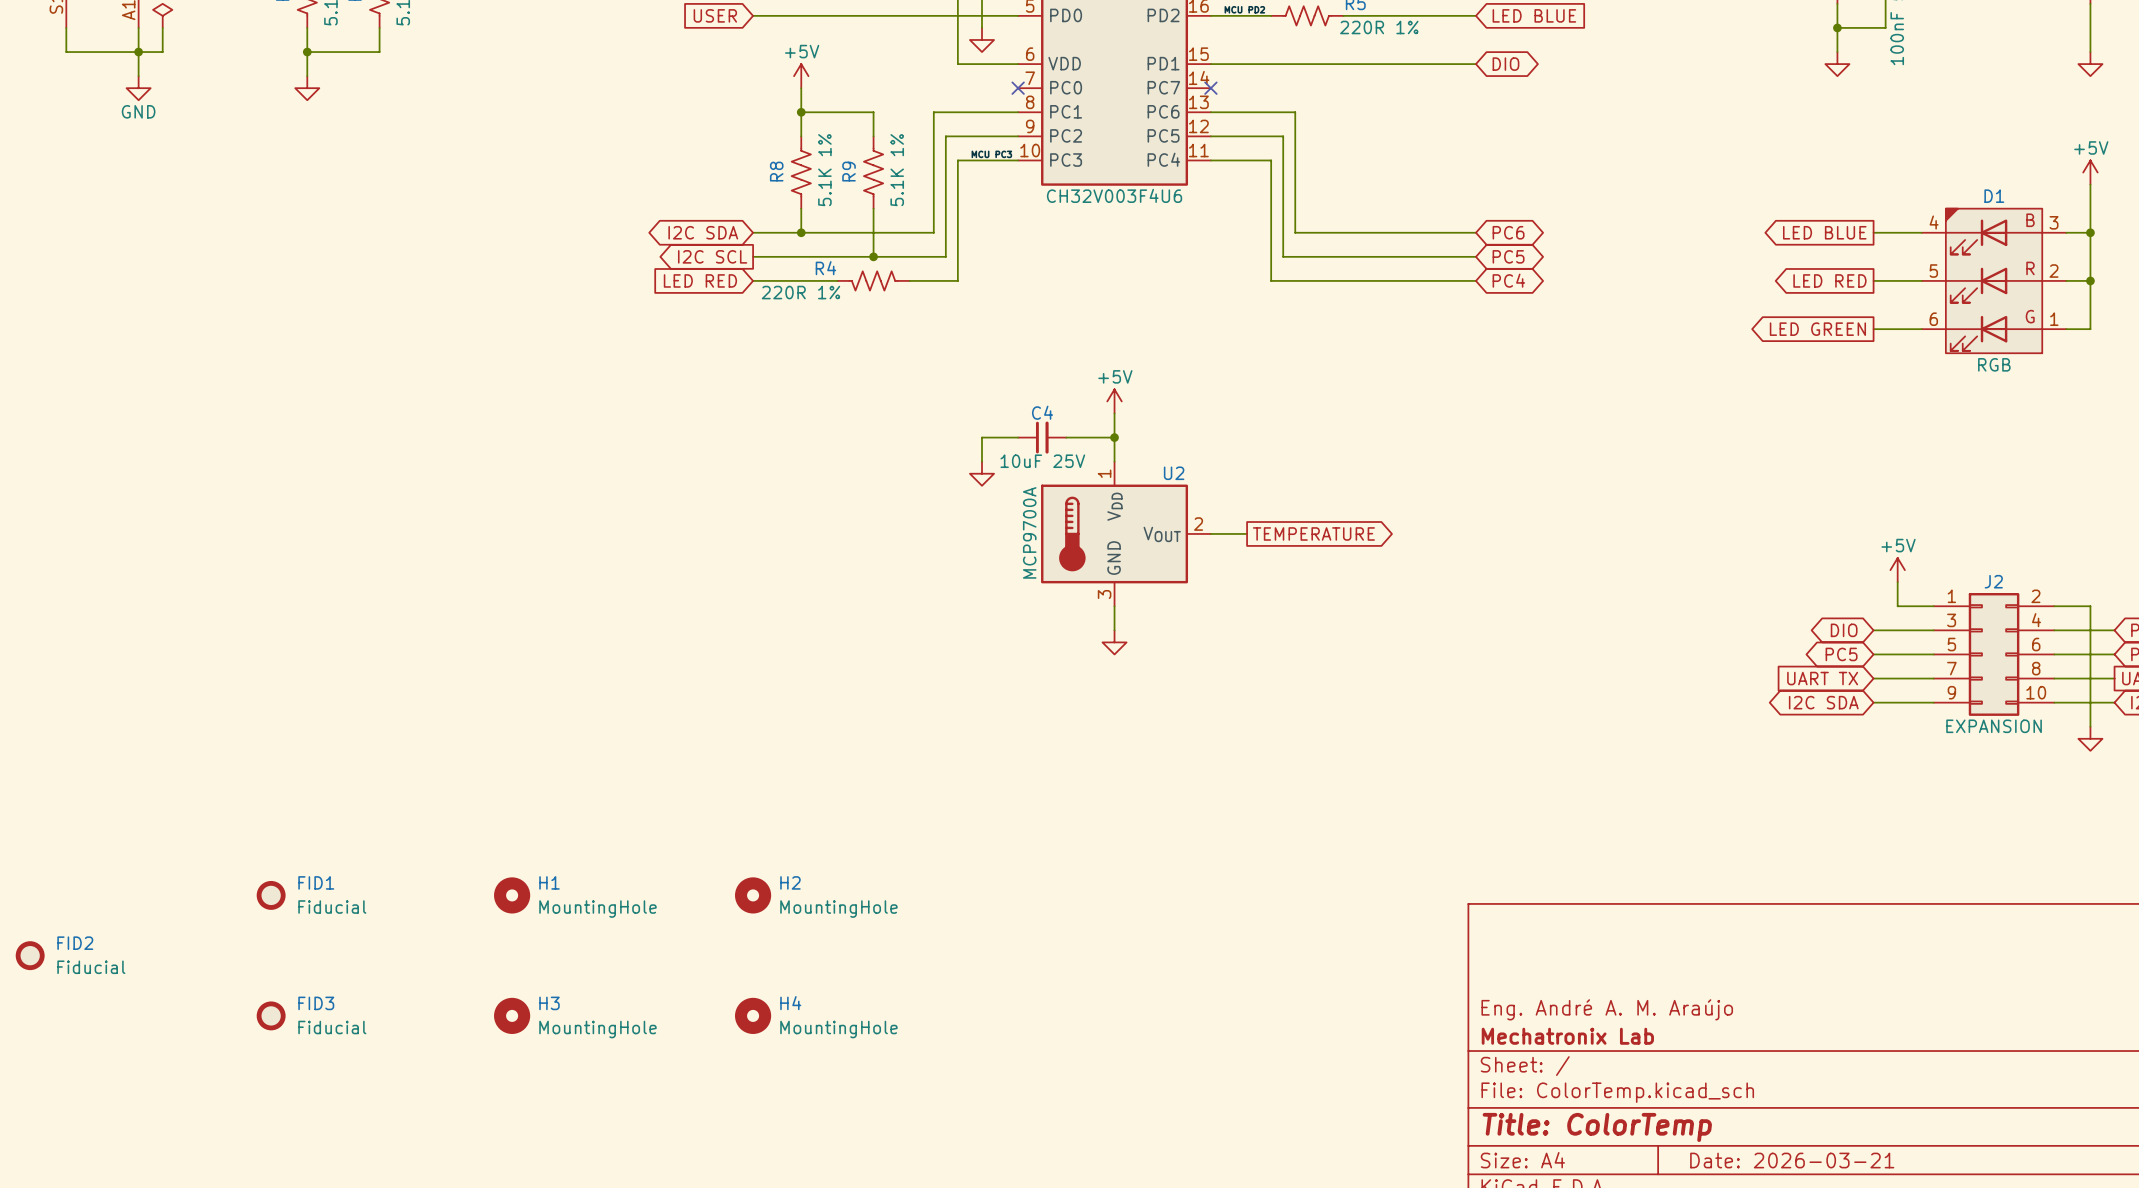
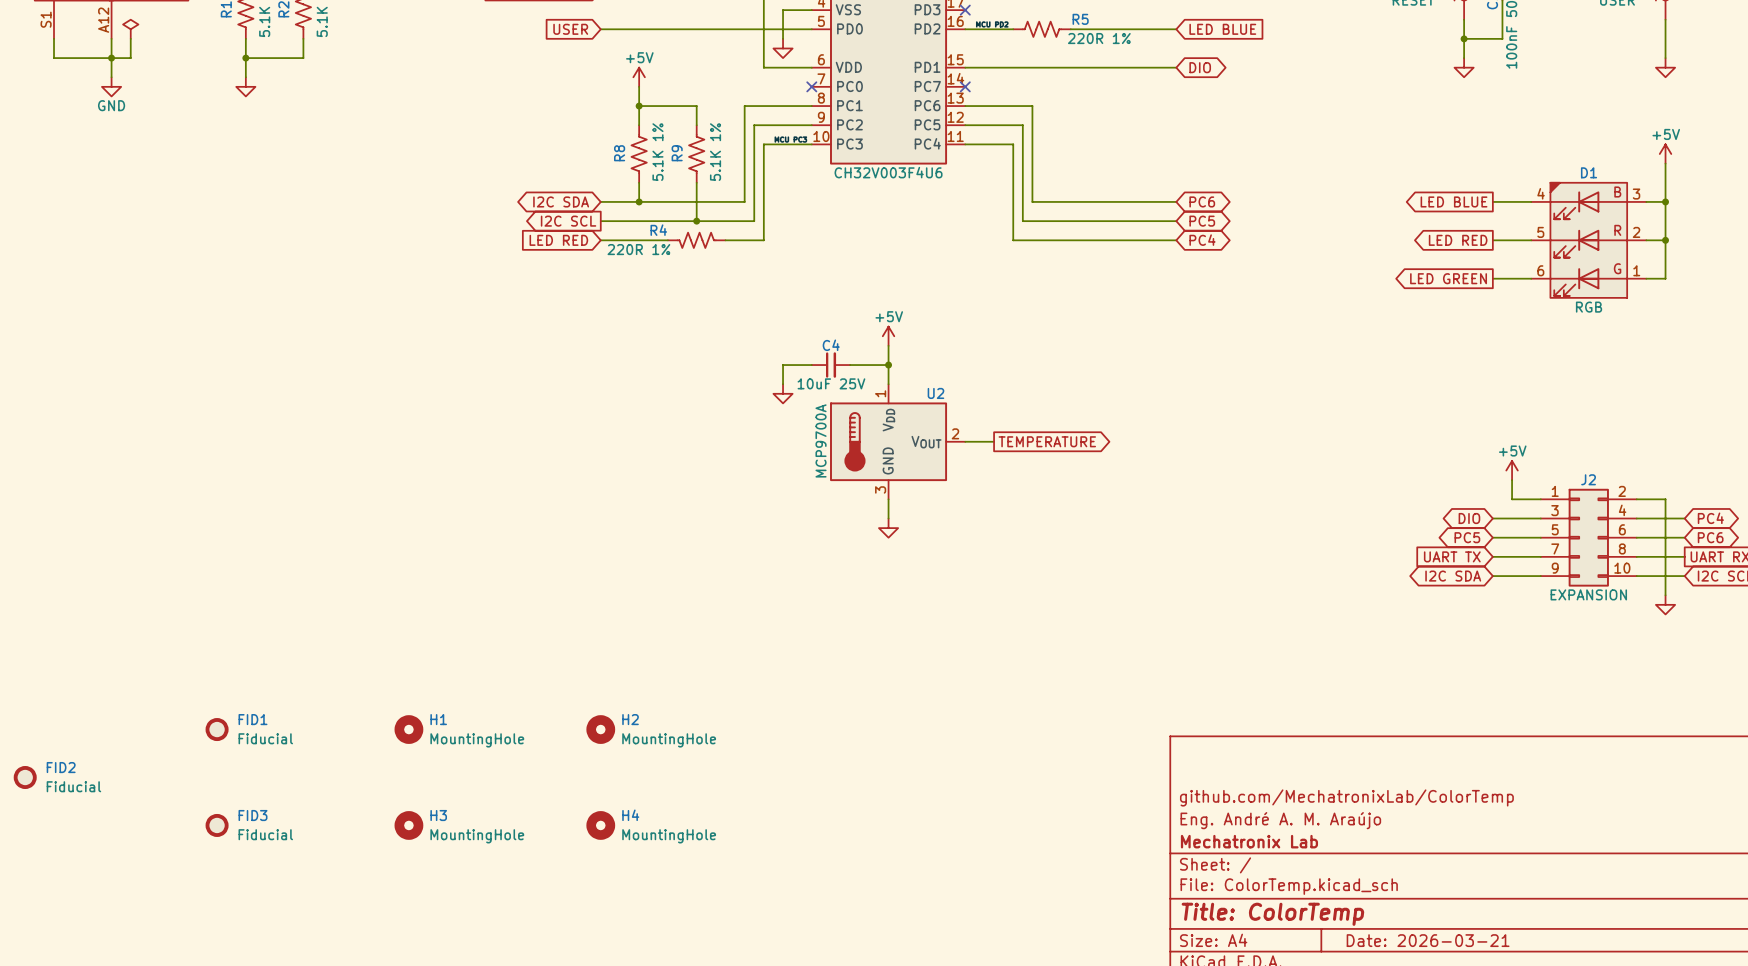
title block: none -> github.com/MechatronixLab/ColorTemp (1346, 797)

